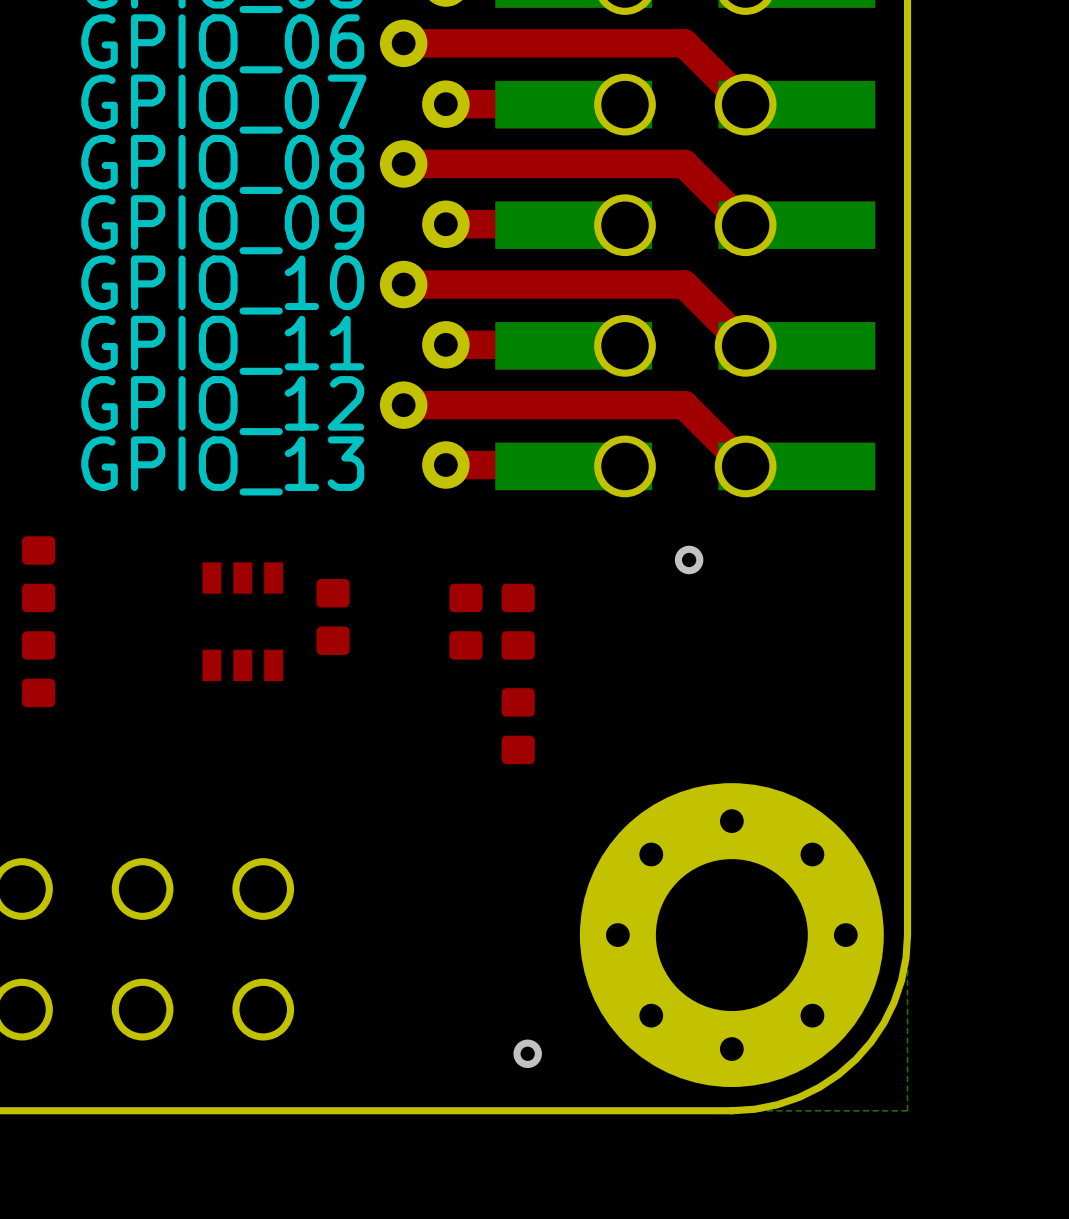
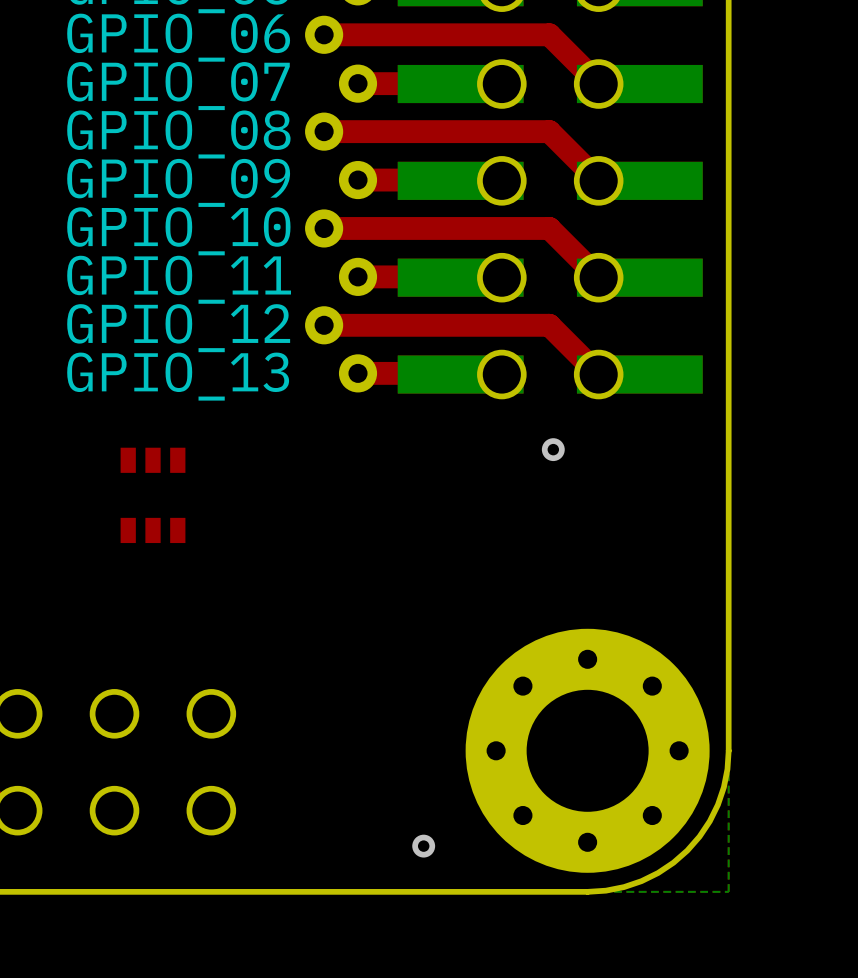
part: (38, 574) -> none
part: (333, 616) -> none
part position: (242, 621) -> (153, 495)
part: (465, 621) -> none
part: (518, 621) -> none
part: (38, 669) -> none
part: (518, 726) -> none

